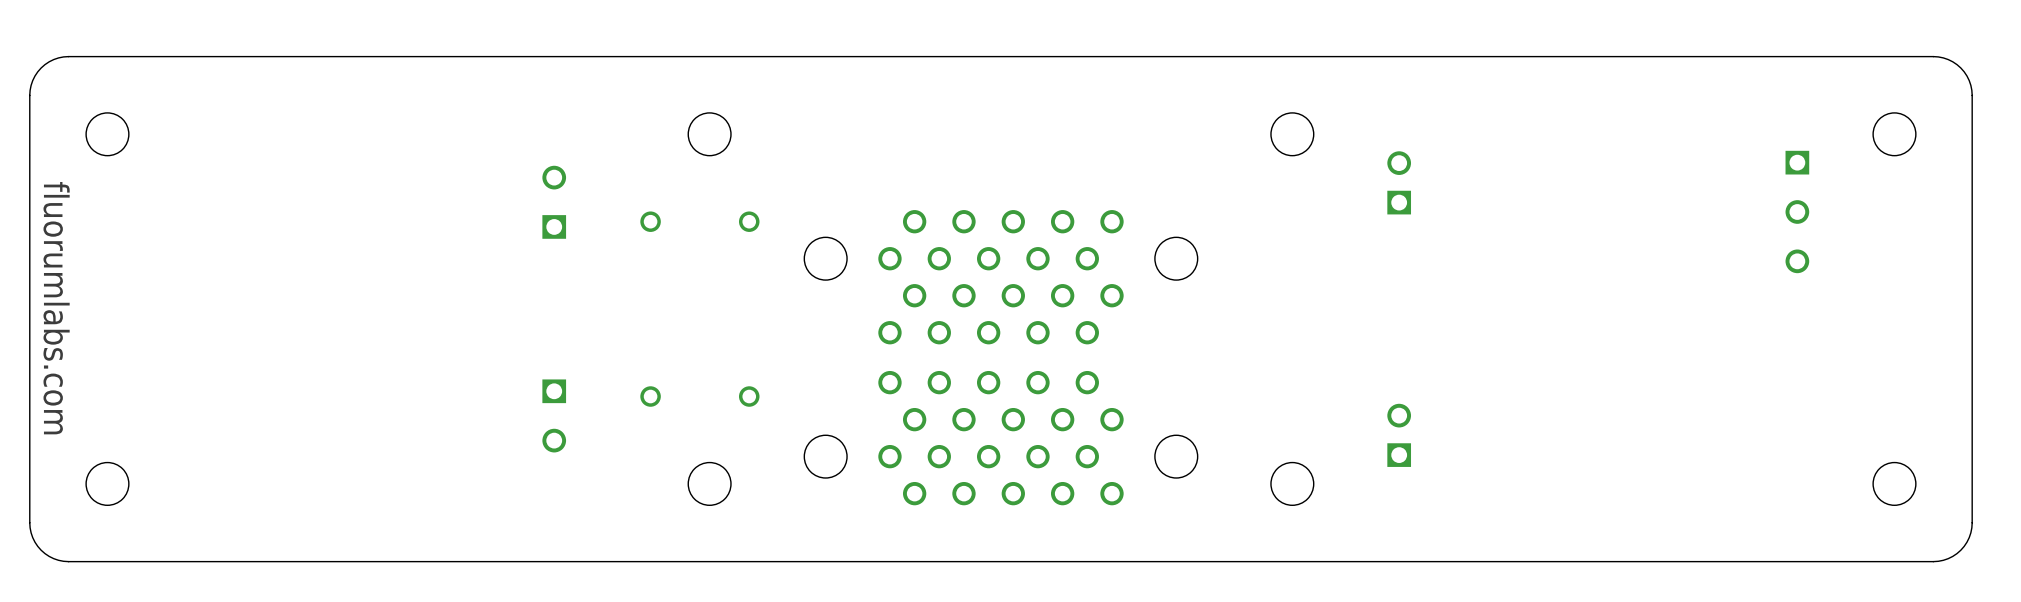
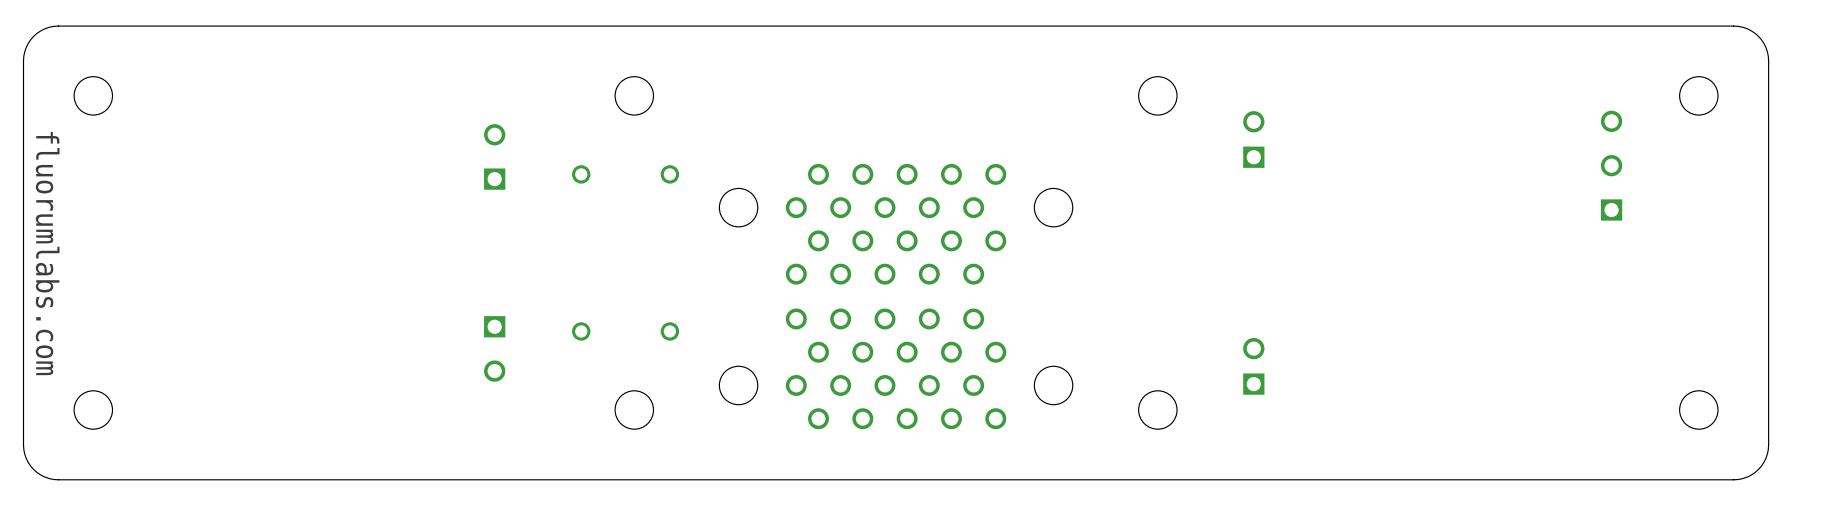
part rotation: 0° (1797, 211) -> 180° (1611, 165)

